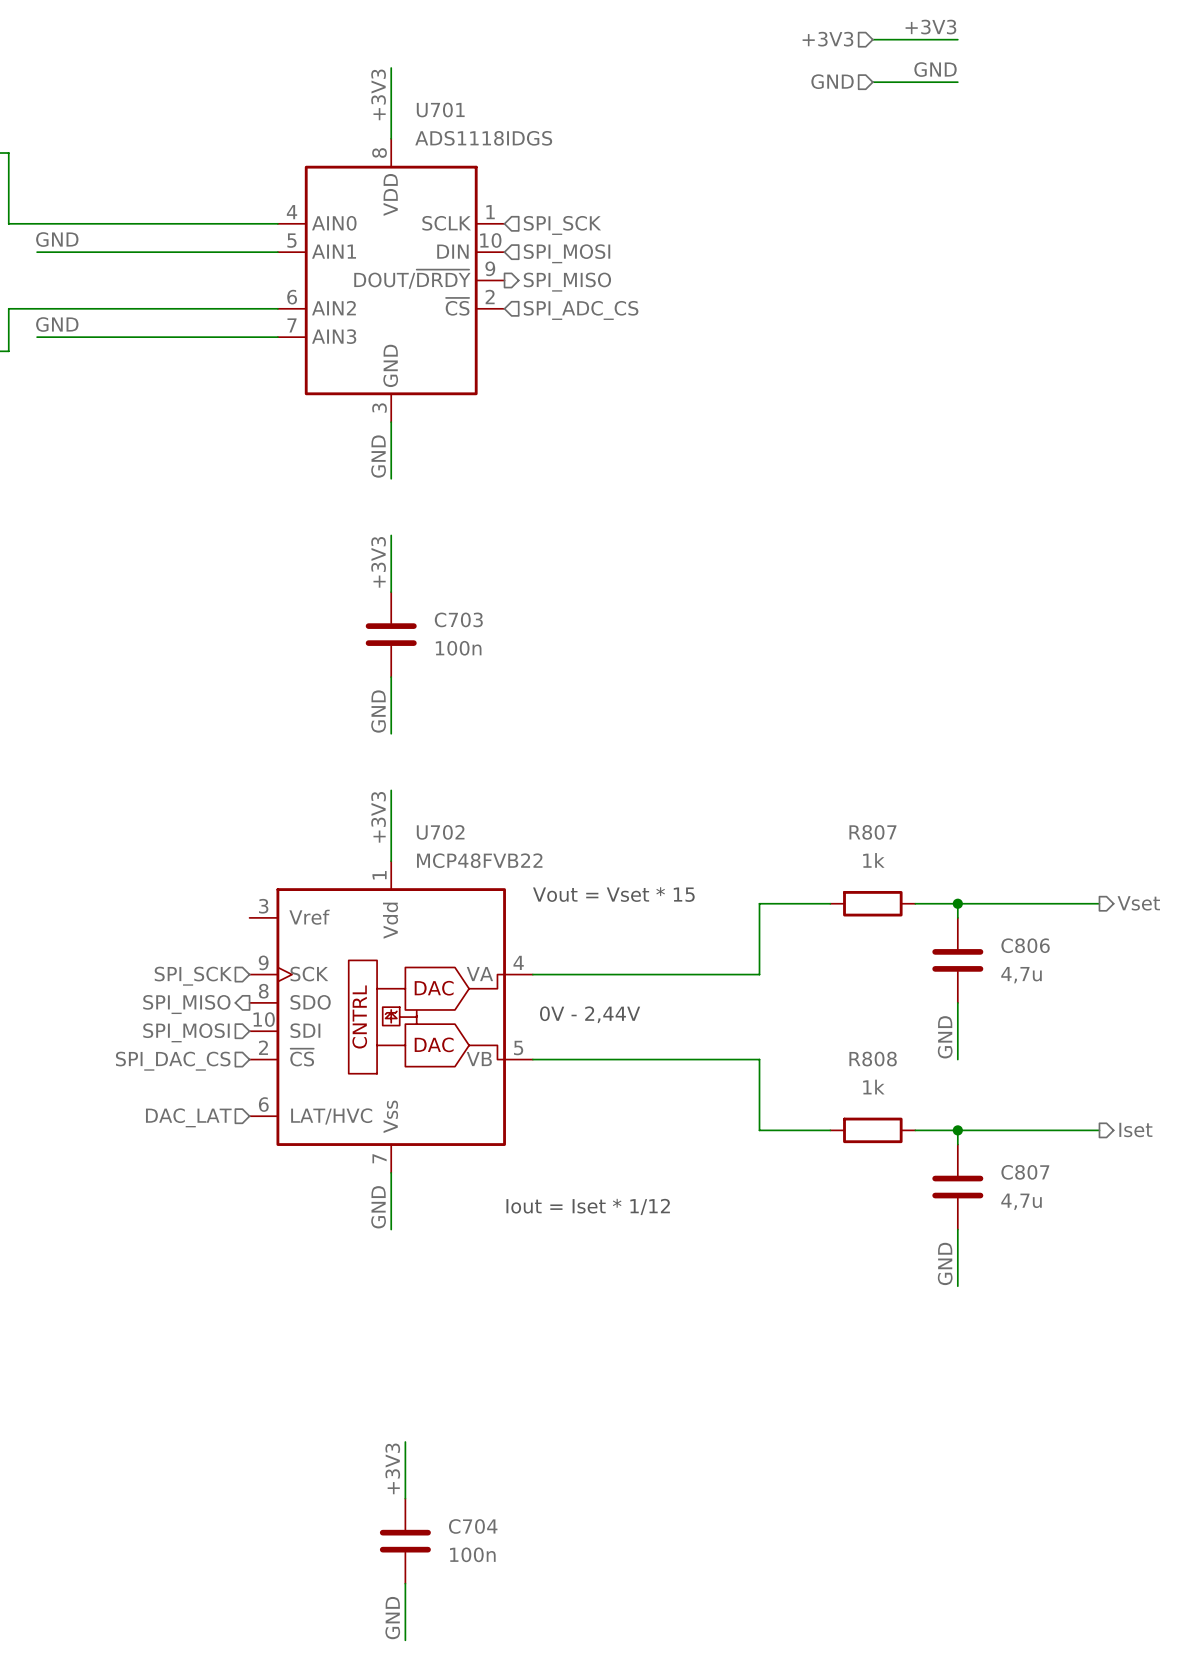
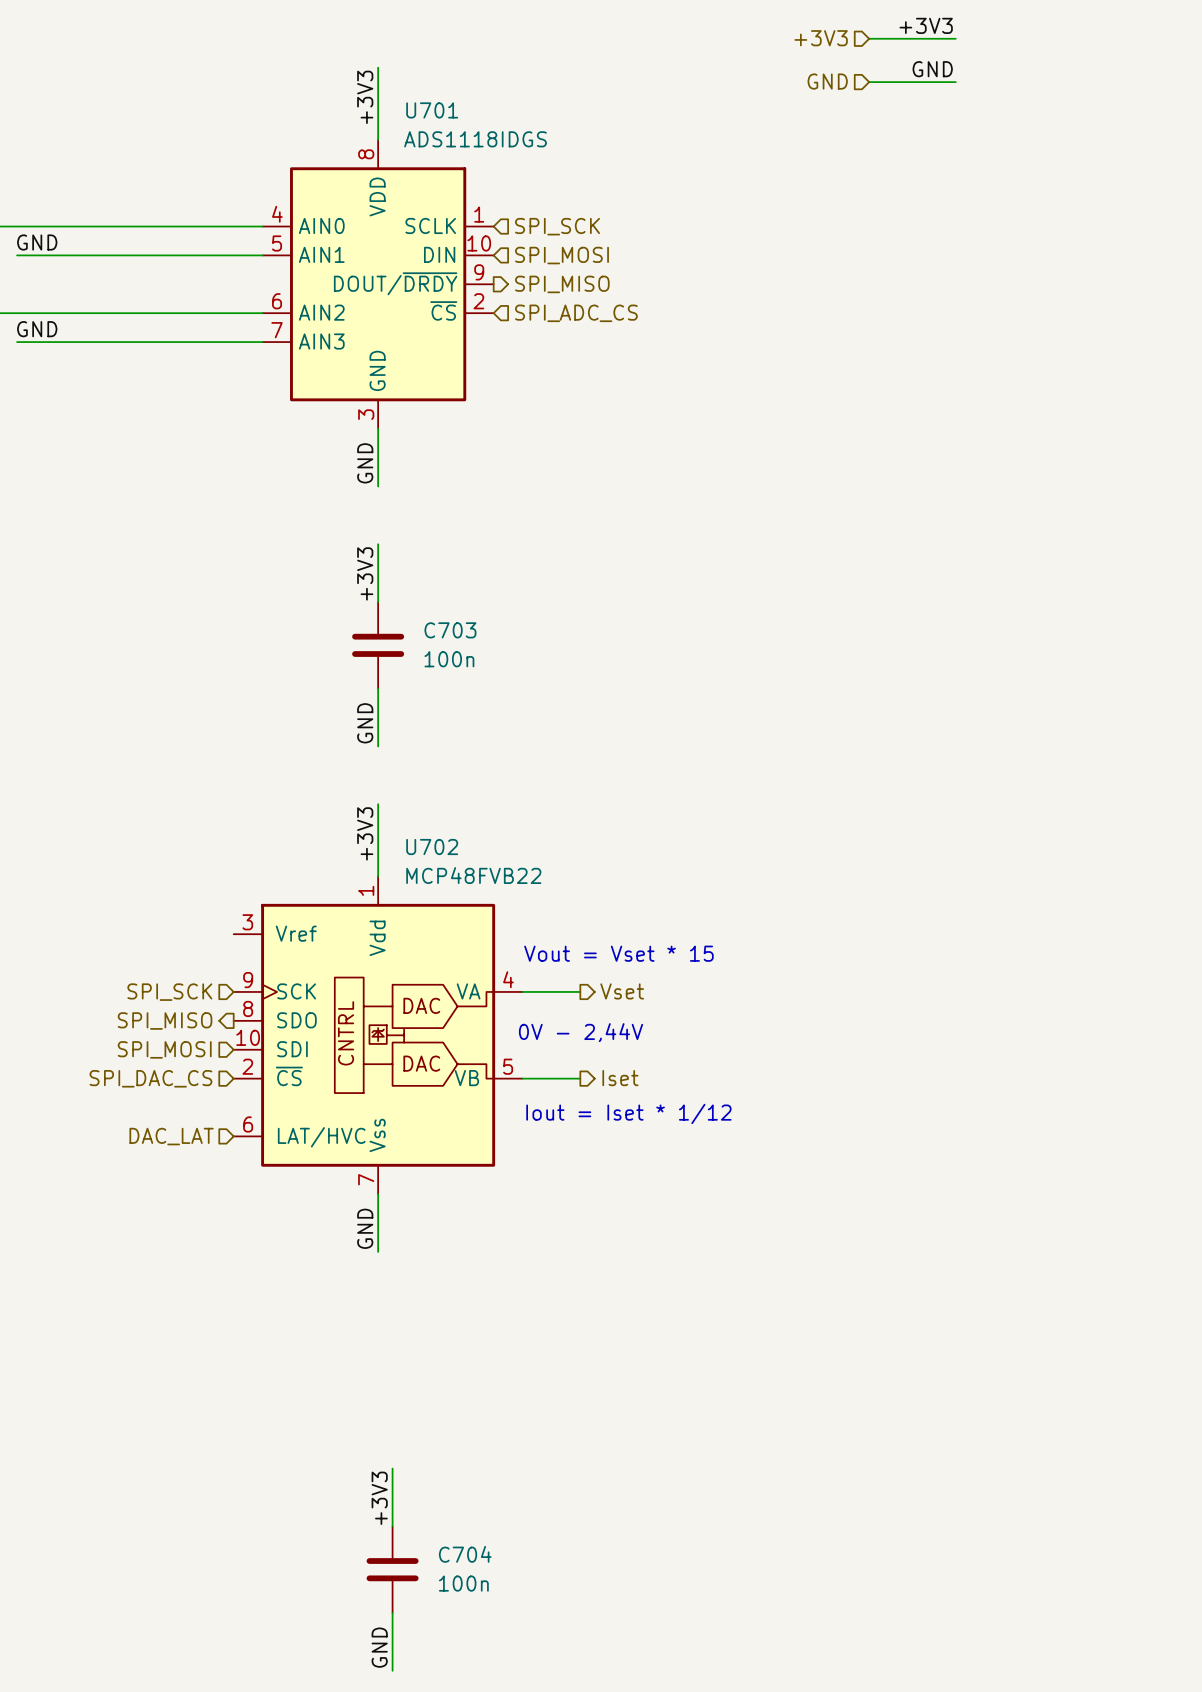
text position: Vout = Vset * 15 (613, 894) -> Vout = Vset * 15 (618, 953)
wire: (830, 903) (759, 903) (759, 974) (589, 974) -> none
R807: 1k (872, 903) -> none
wire: (915, 903) (1099, 903) -> none
wire: (957, 903) (957, 917) -> none
junction: (957, 903) -> none
hierarchical label: Vset (1138, 903) -> none
C806: 4,7u (957, 960) -> none
hierarchical label: none -> Vset (622, 991)
wire: (957, 1002) (957, 1059) -> none
label: GND (945, 1037) -> none
wire: (589, 1059) (759, 1059) (759, 1130) (830, 1130) -> none
hierarchical label: none -> Iset (620, 1078)
hierarchical label: Iset (1135, 1129) -> none
R808: 1k (872, 1130) -> none
wire: (915, 1130) (1099, 1130) -> none
wire: (957, 1130) (957, 1144) -> none
junction: (957, 1130) -> none
C807: 4,7u (957, 1187) -> none
text position: Iout = Iset * 1/12 (588, 1206) -> Iout = Iset * 1/12 (628, 1113)
wire: (957, 1229) (957, 1286) -> none
label: GND (945, 1263) -> none

